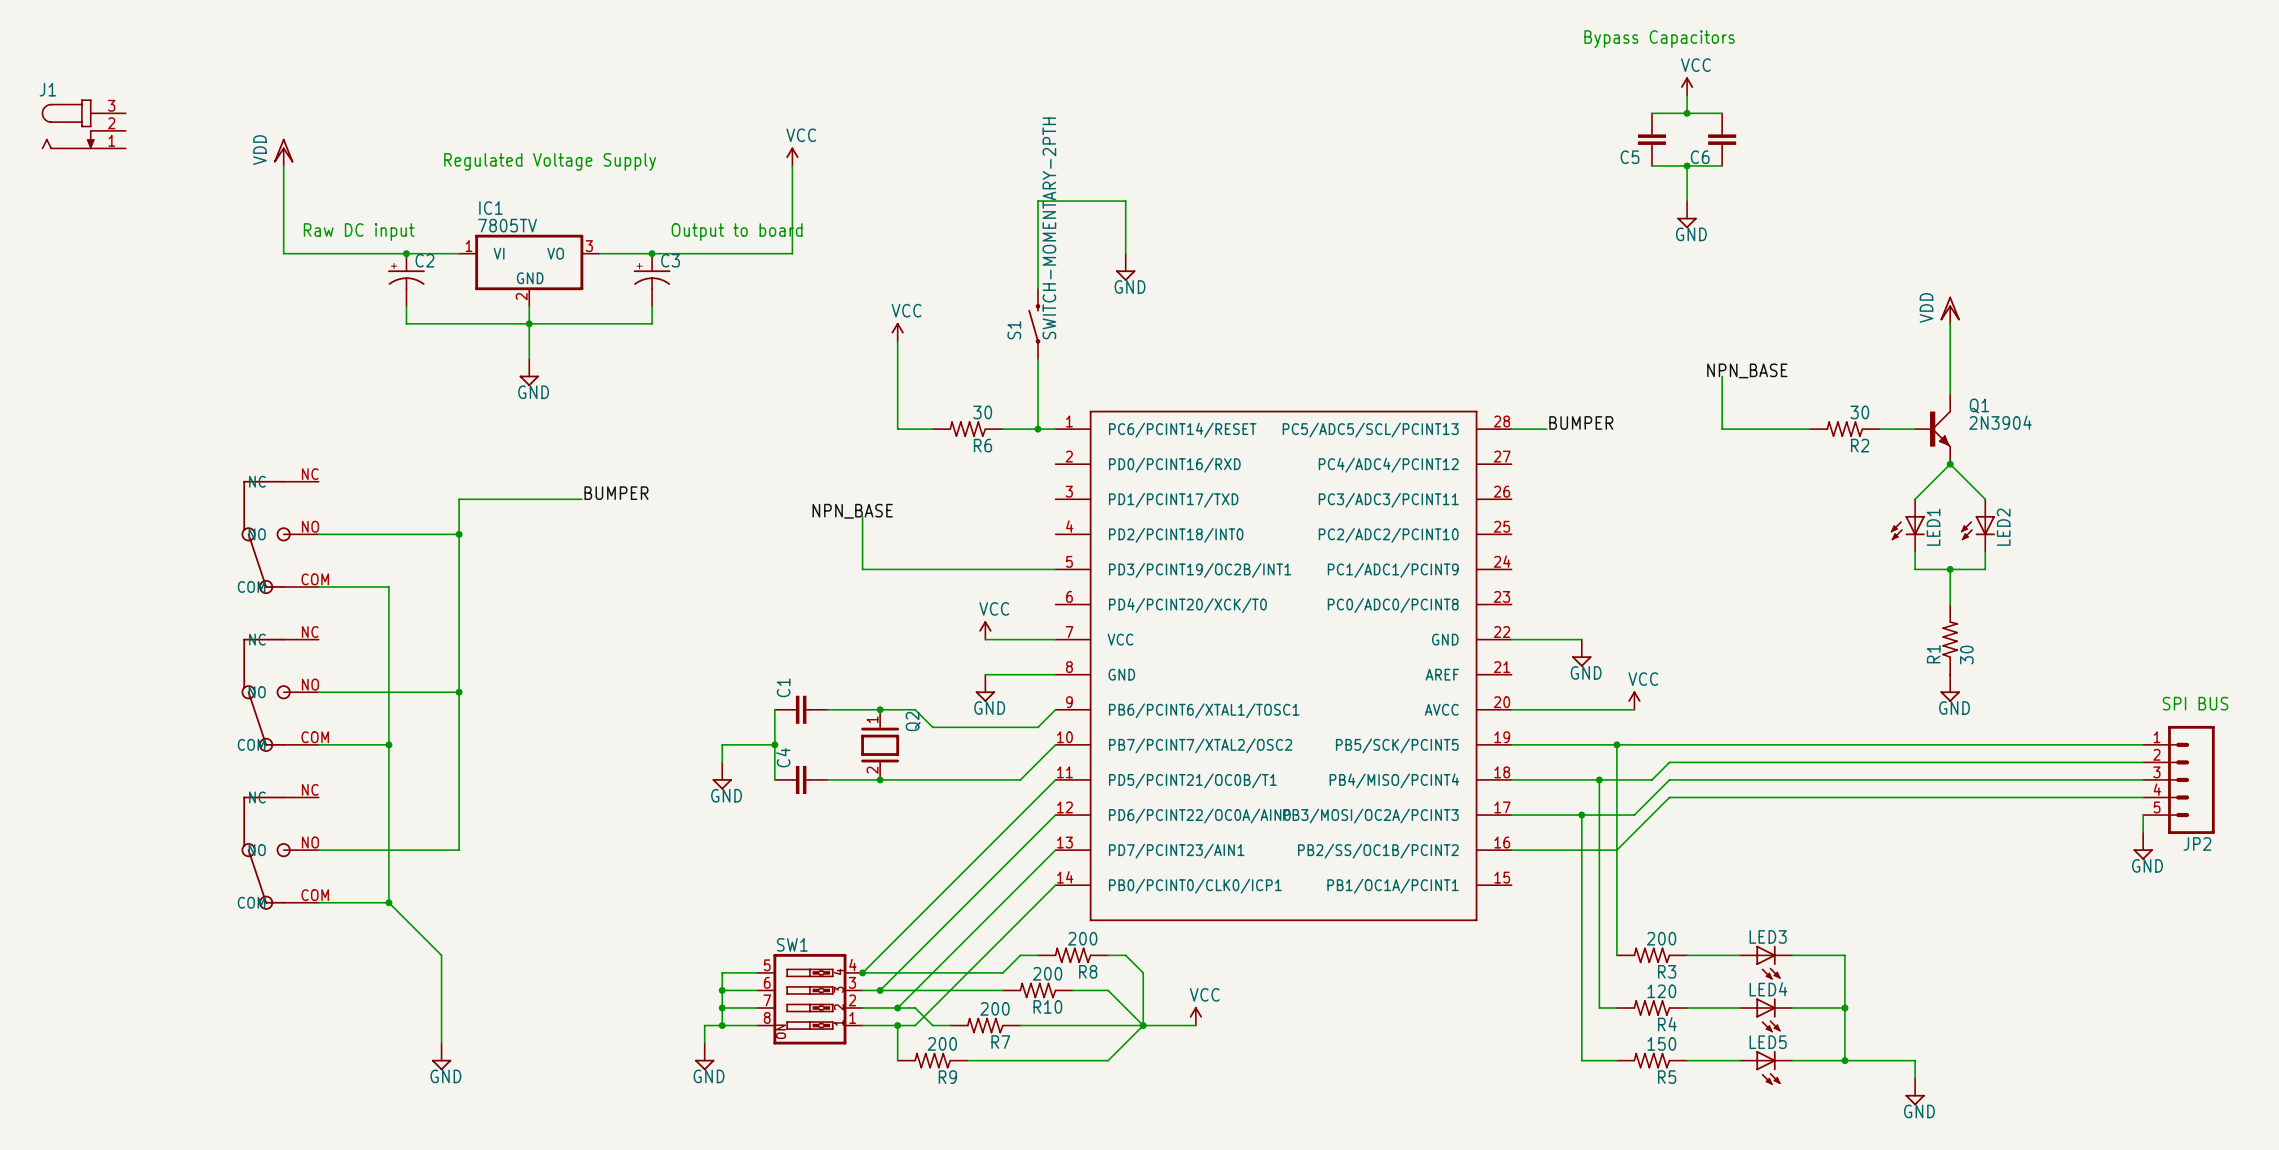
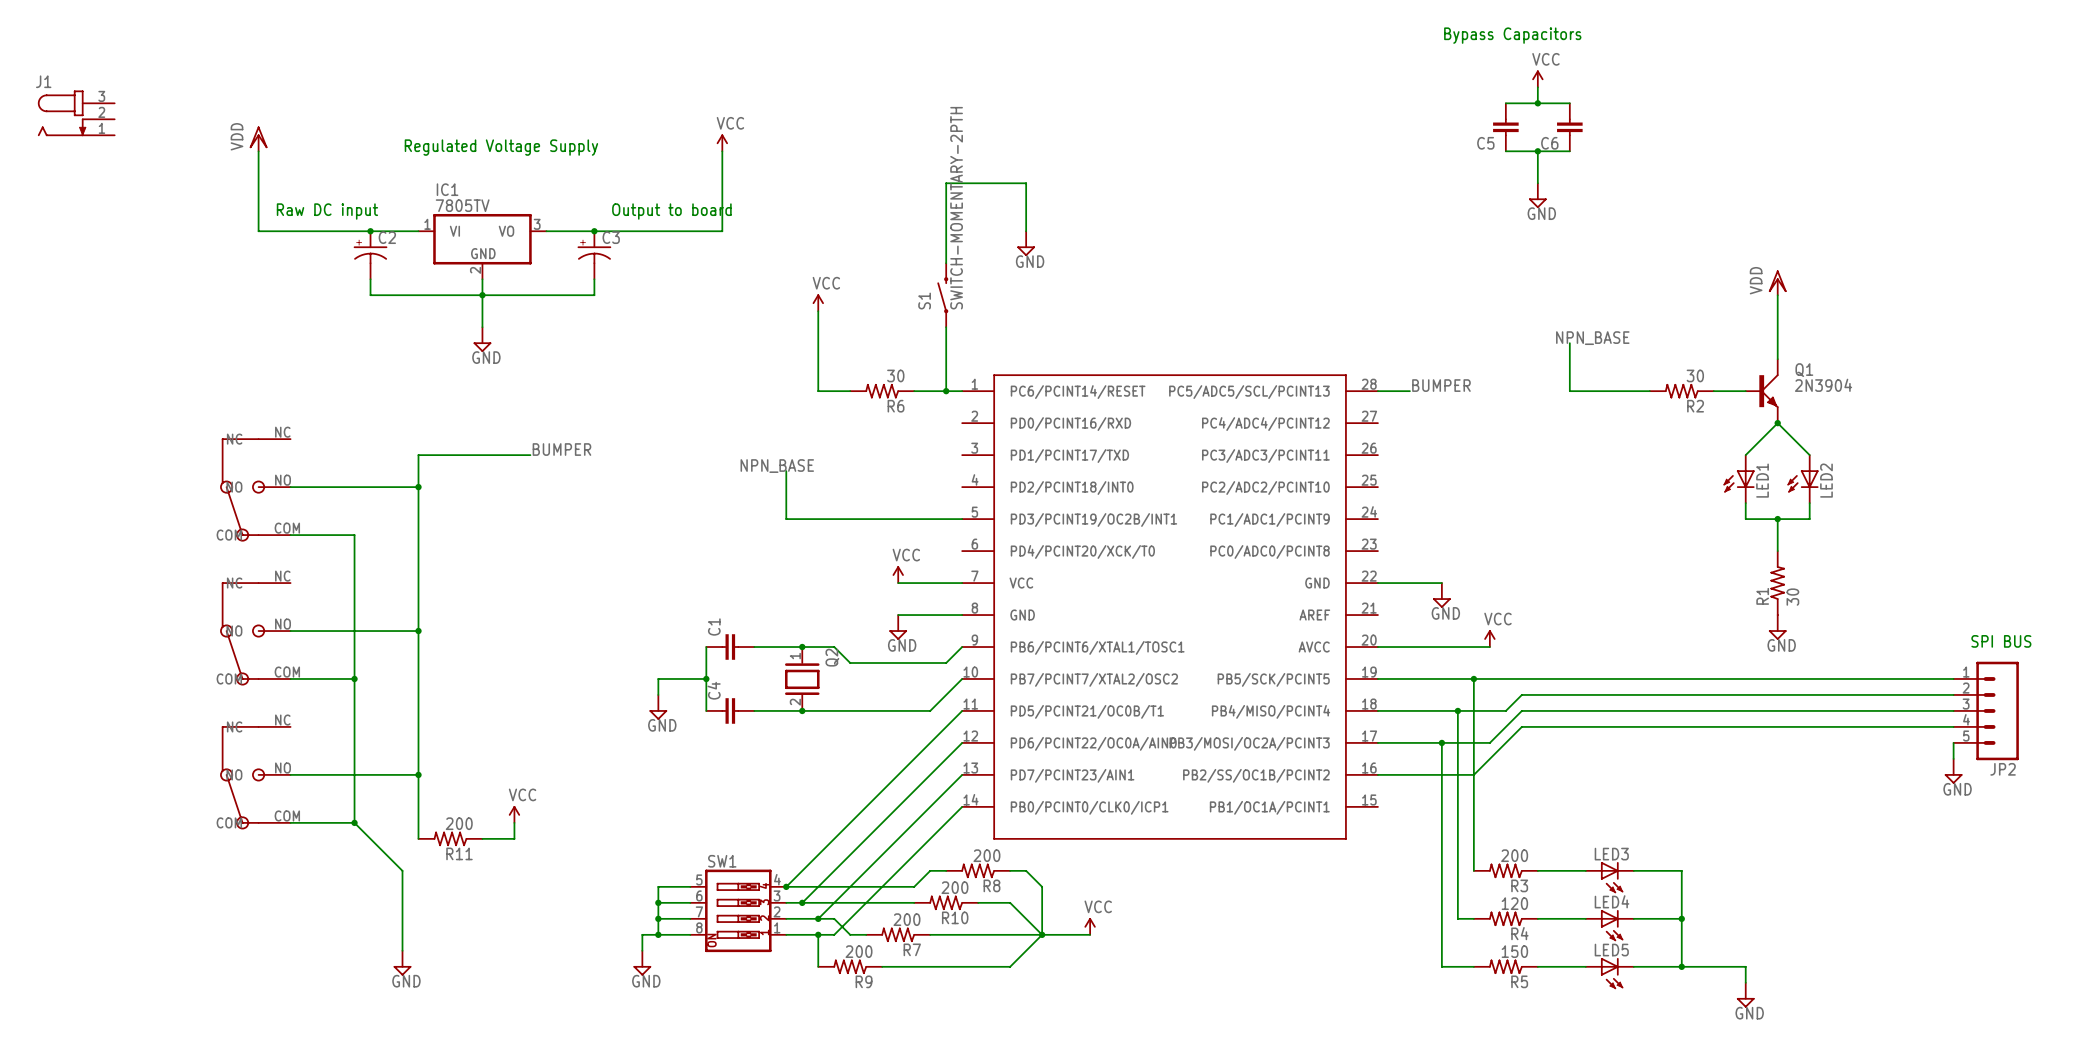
wire: none -> (418, 774) (418, 838)
junction: none -> (418, 774)
power symbol: none -> VCC (514, 814)
wire: none -> (514, 822) (514, 838) (482, 838)
R11: none -> 200 (450, 838)

